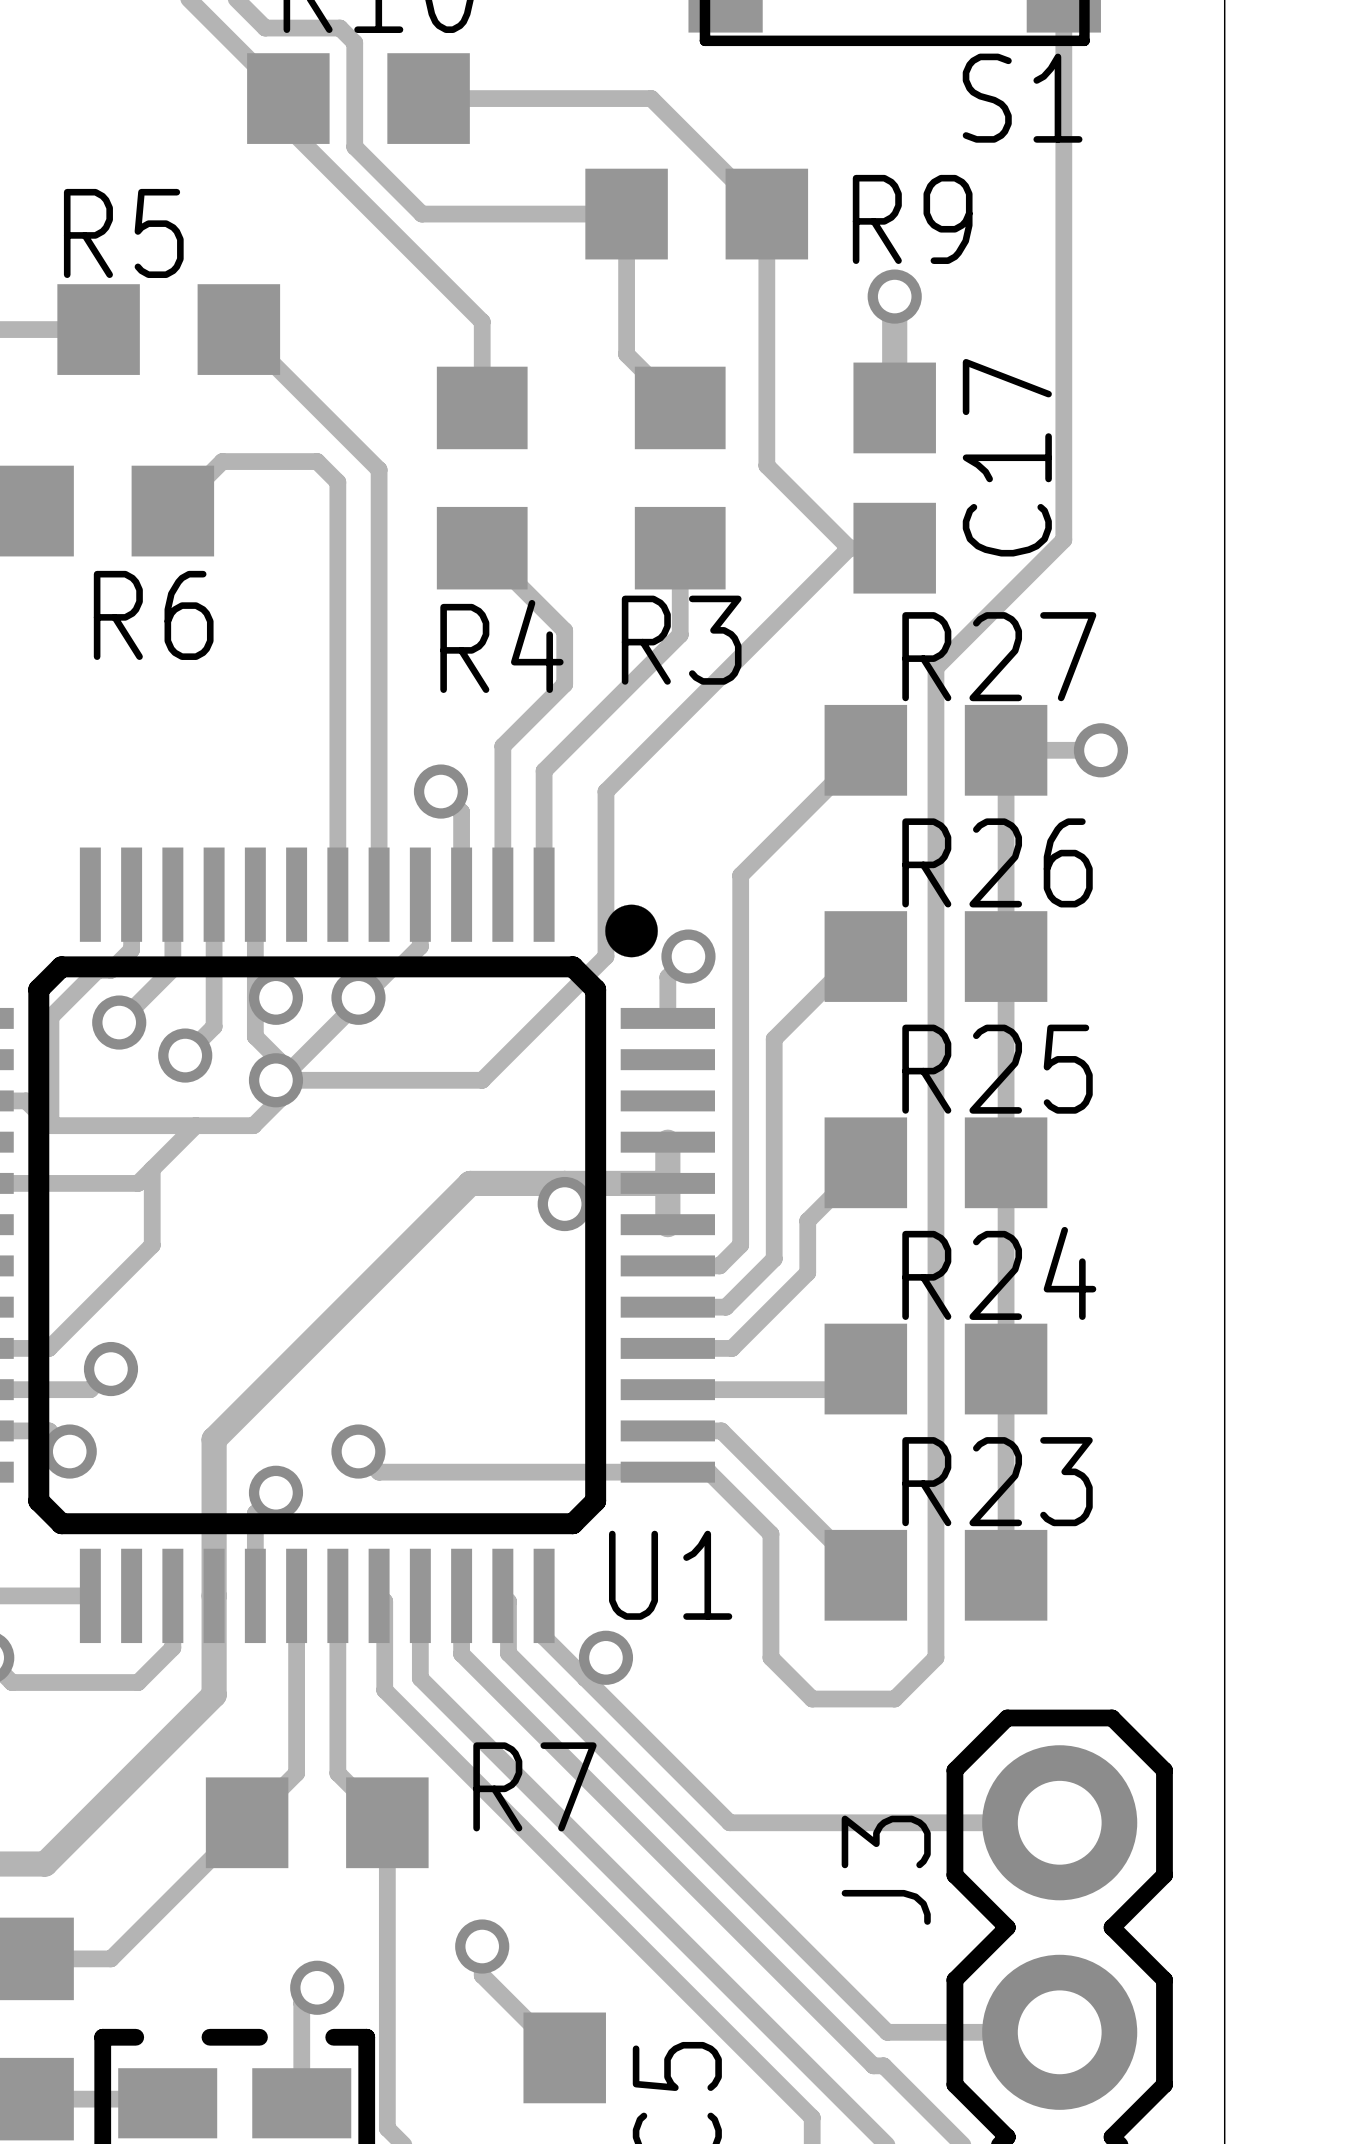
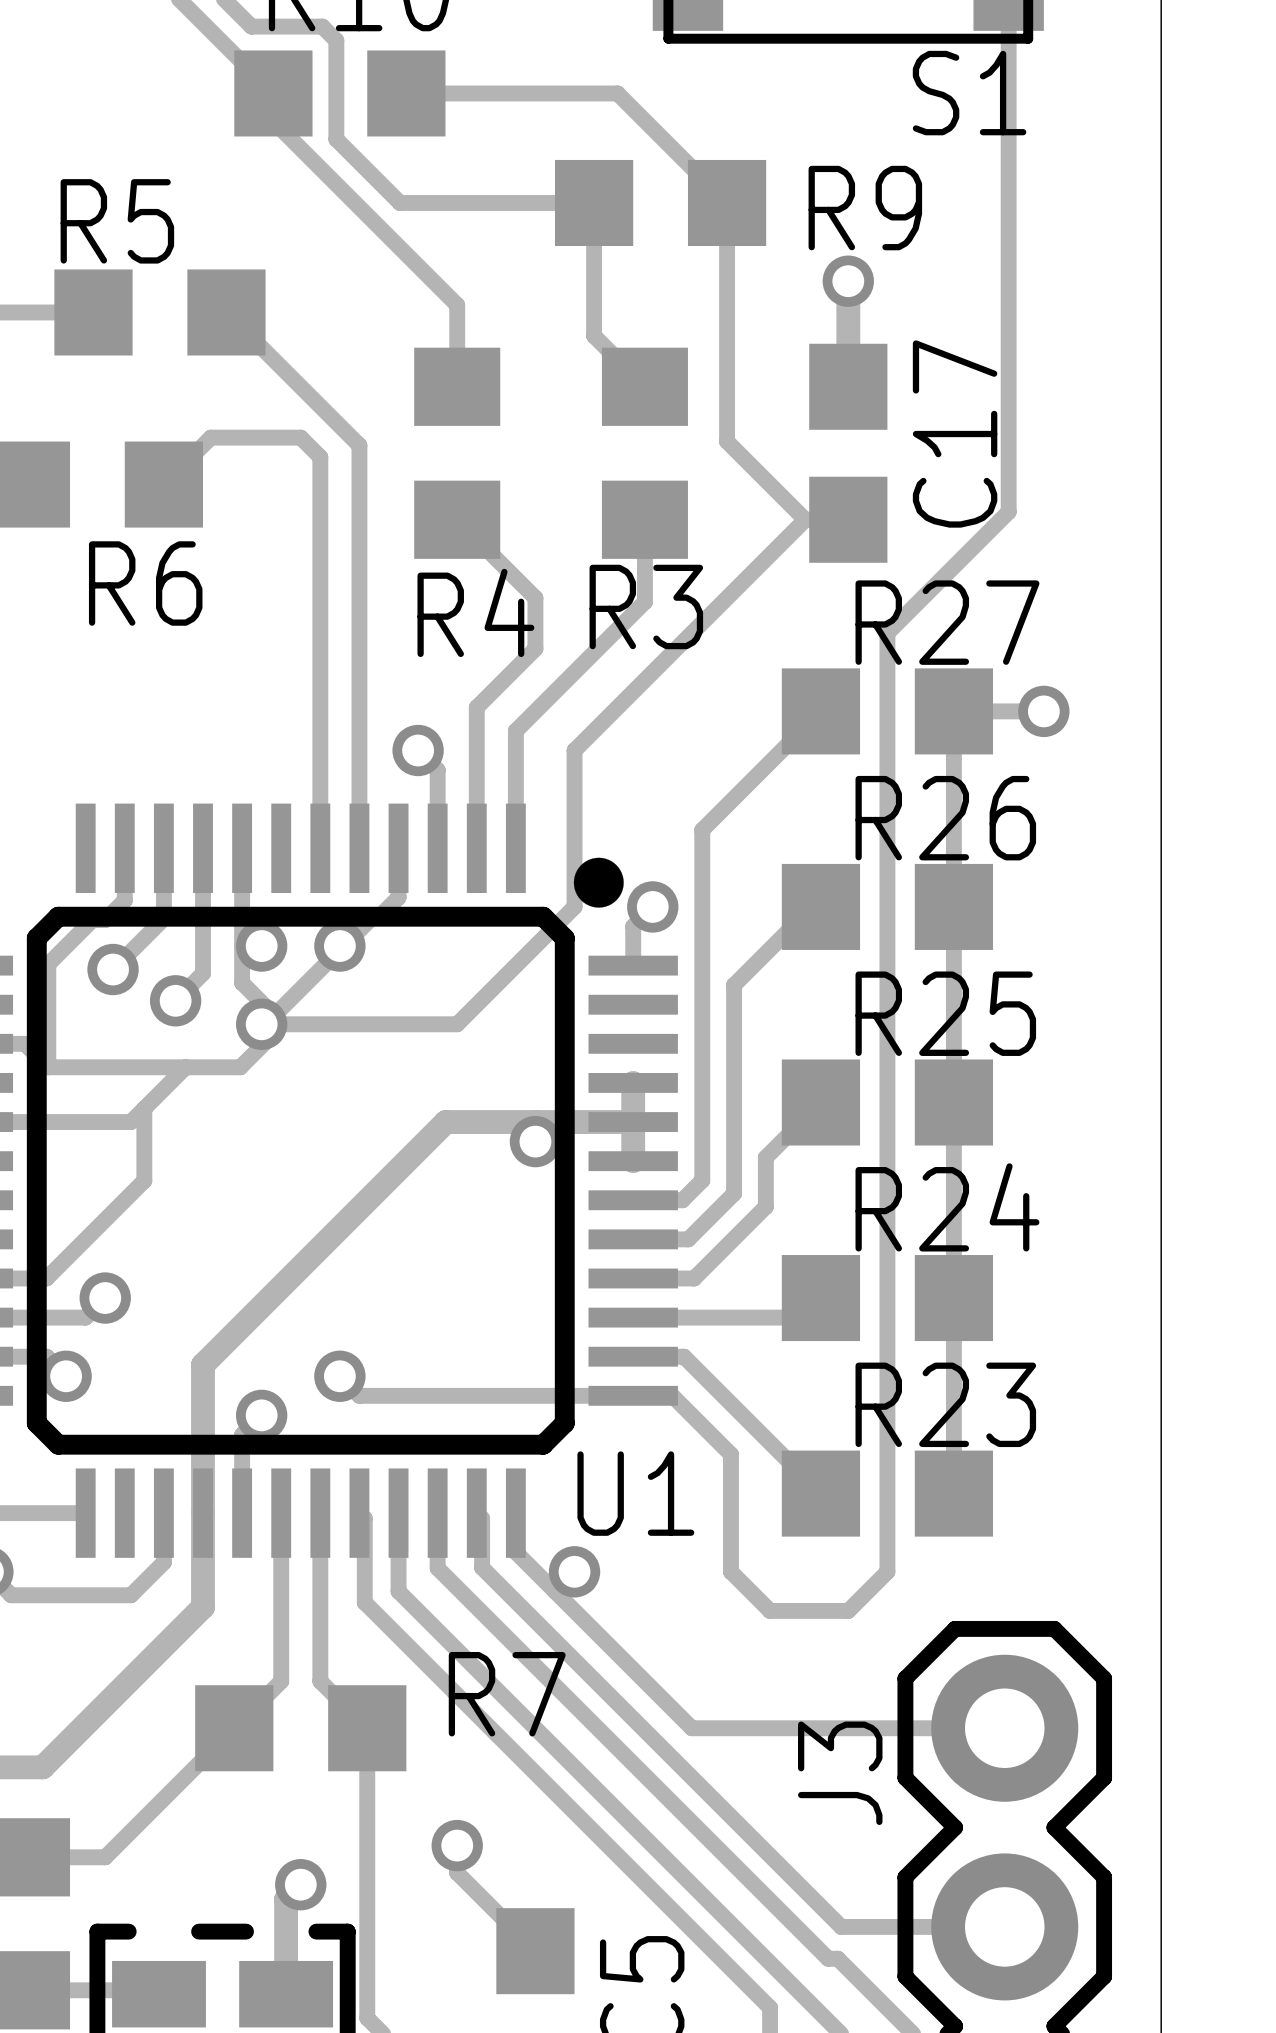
track width: thin (317, 1987) (301, 2003) (301, 2103) -> thick (300, 1884) (286, 1899) (286, 1994)

